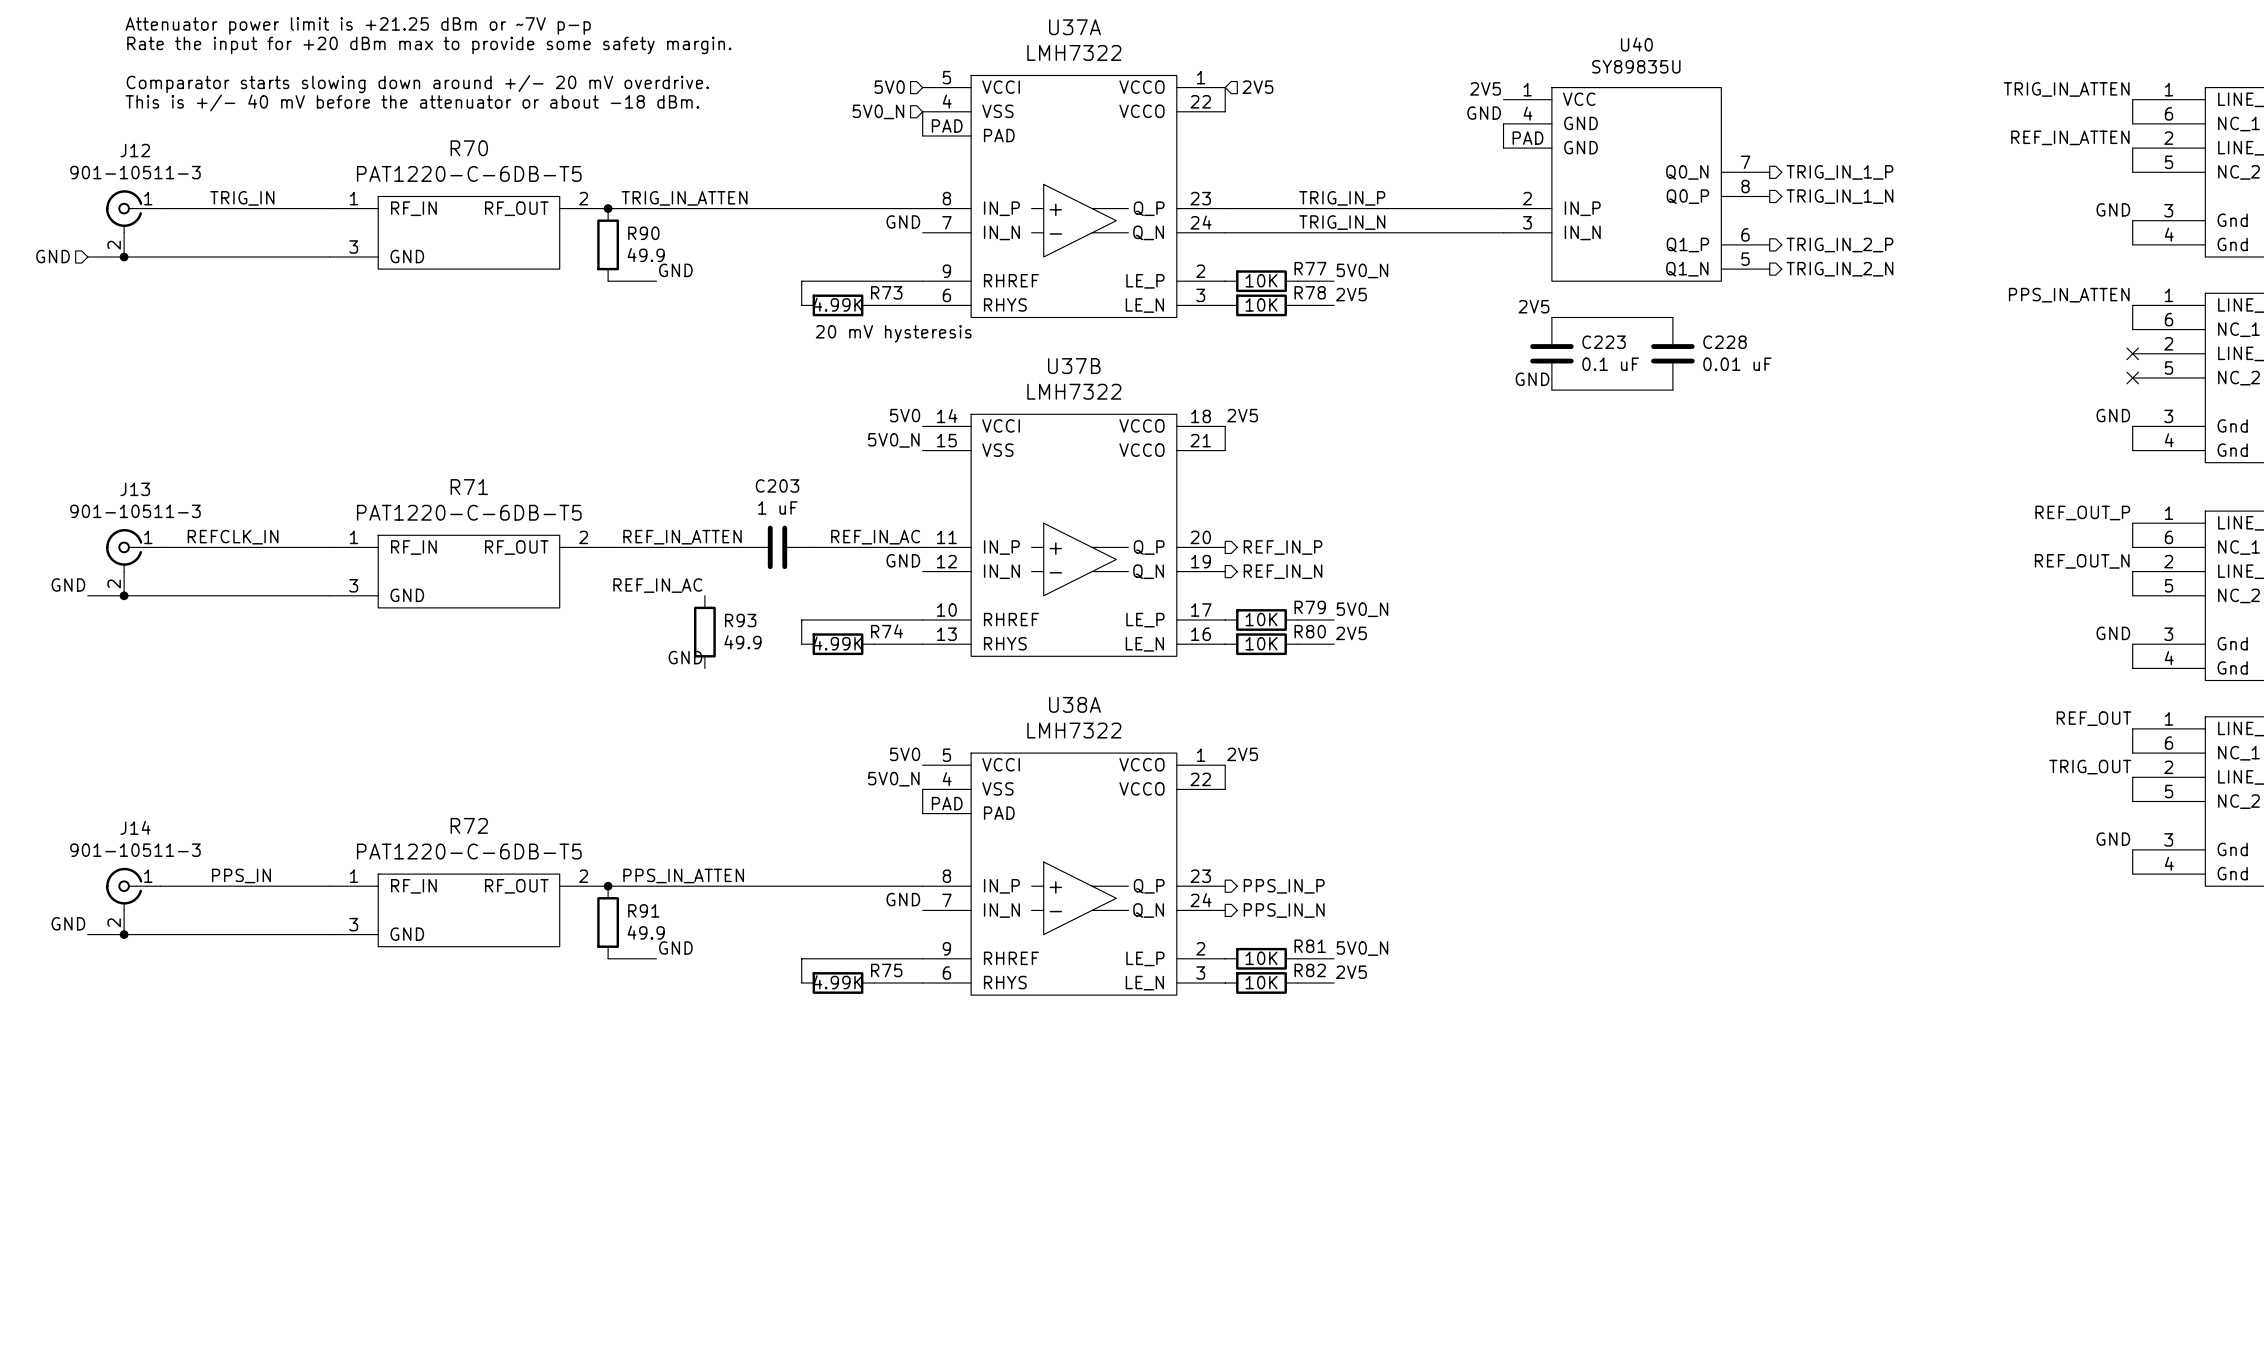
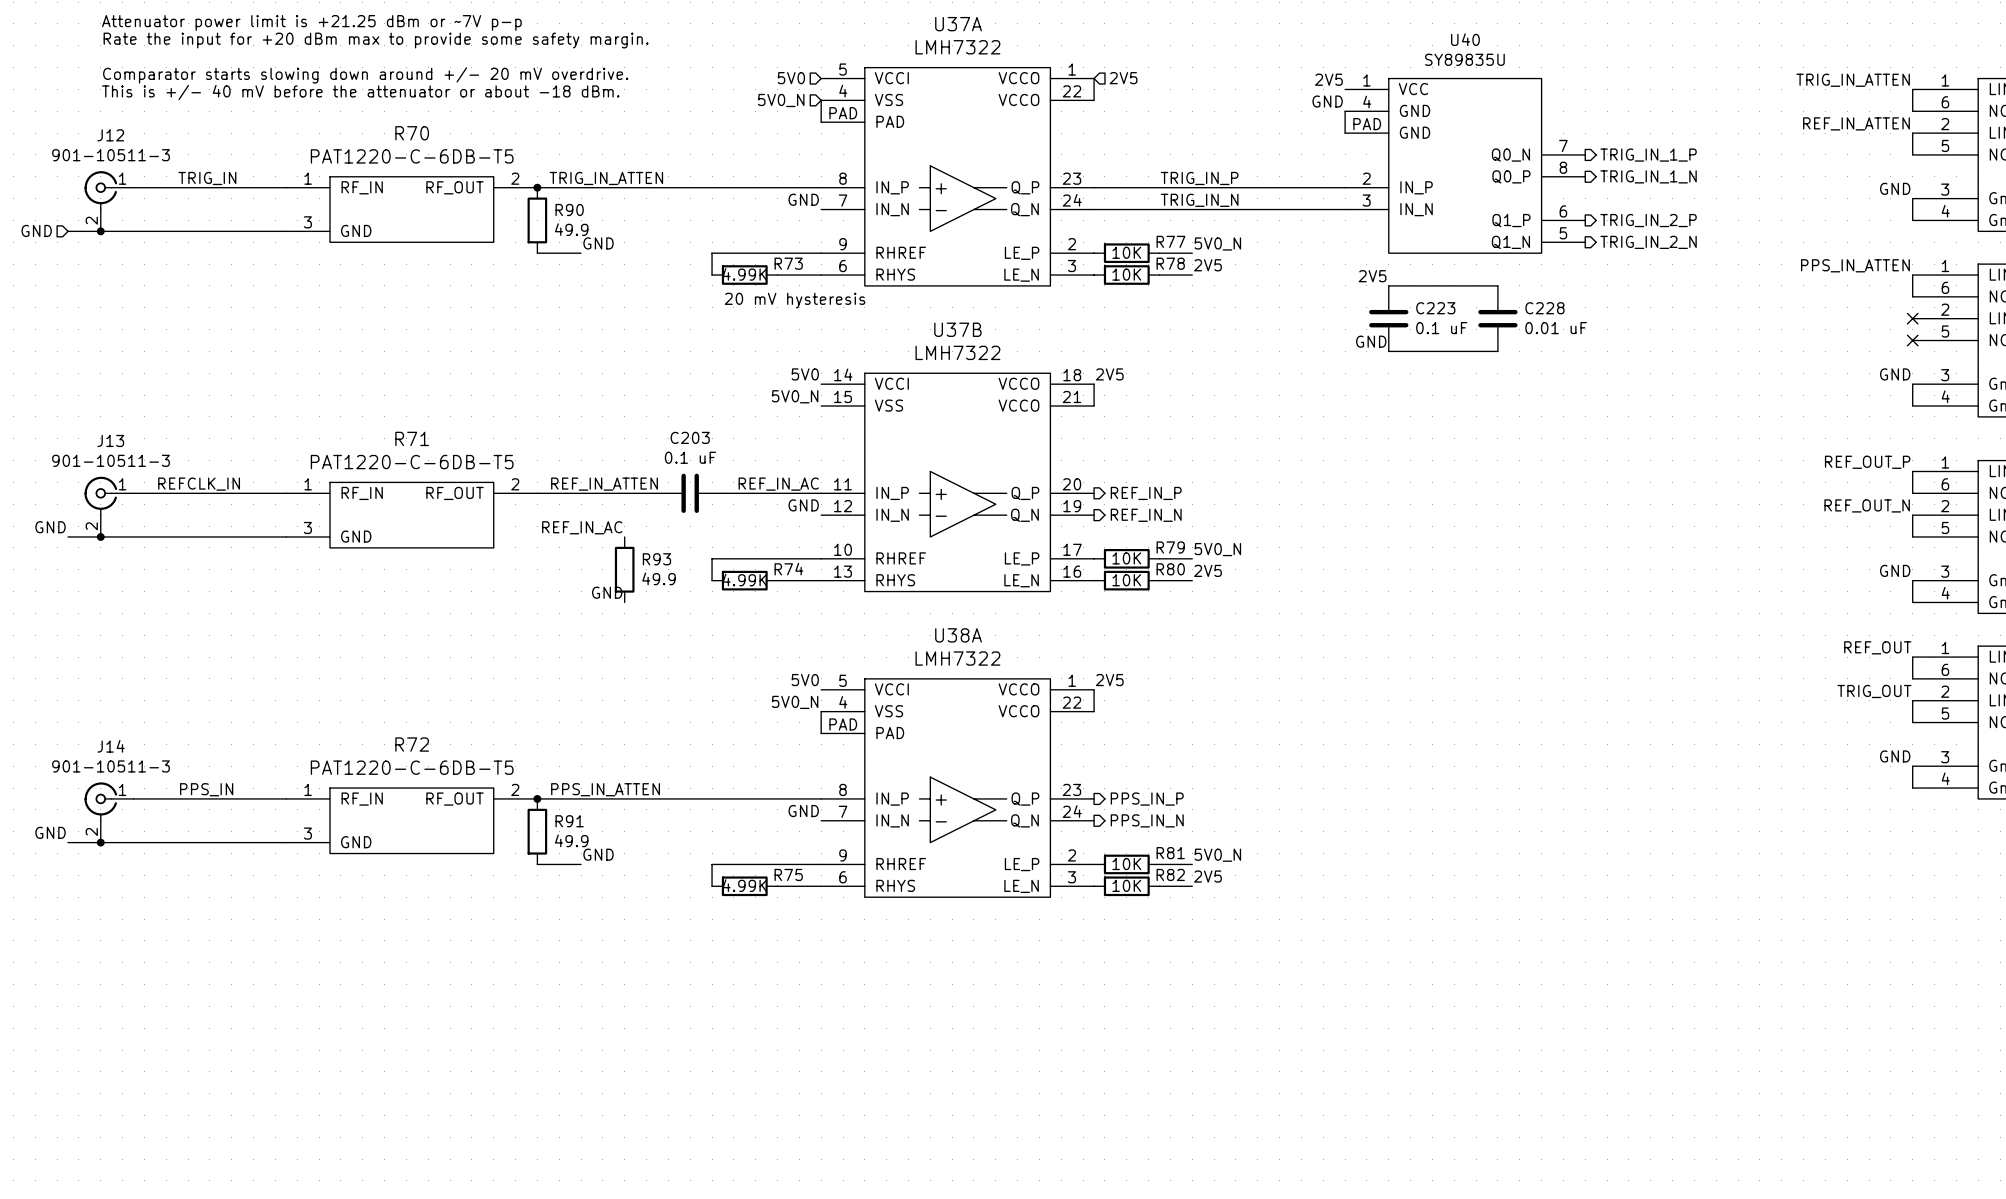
C203 value: 1 uF (777, 507) -> 0.1 uF (690, 457)

